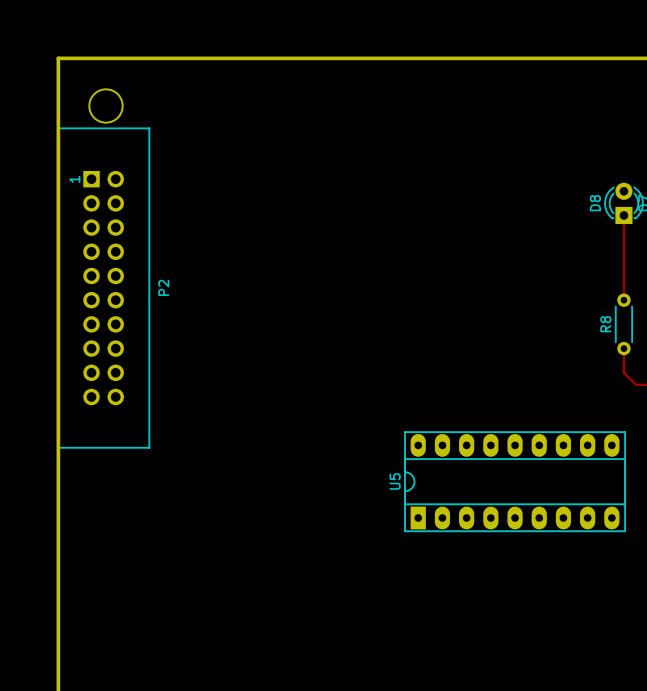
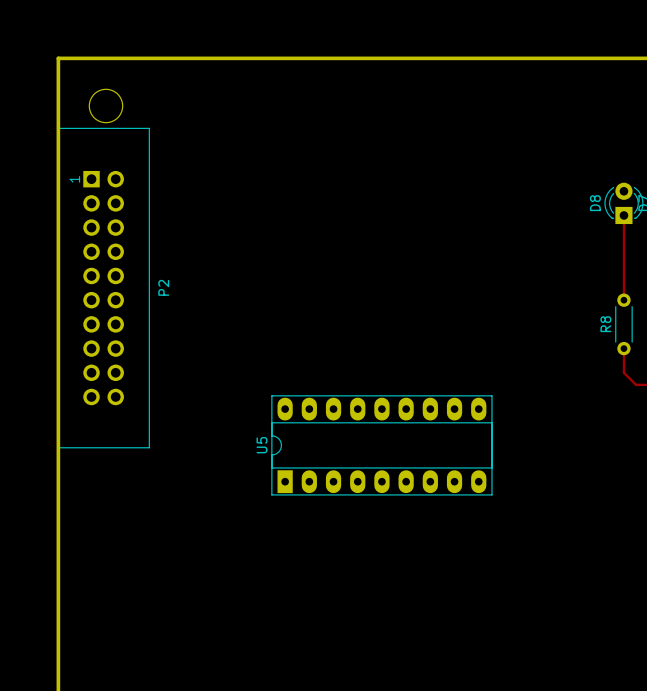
U5 position: (515, 481) -> (381, 445)

